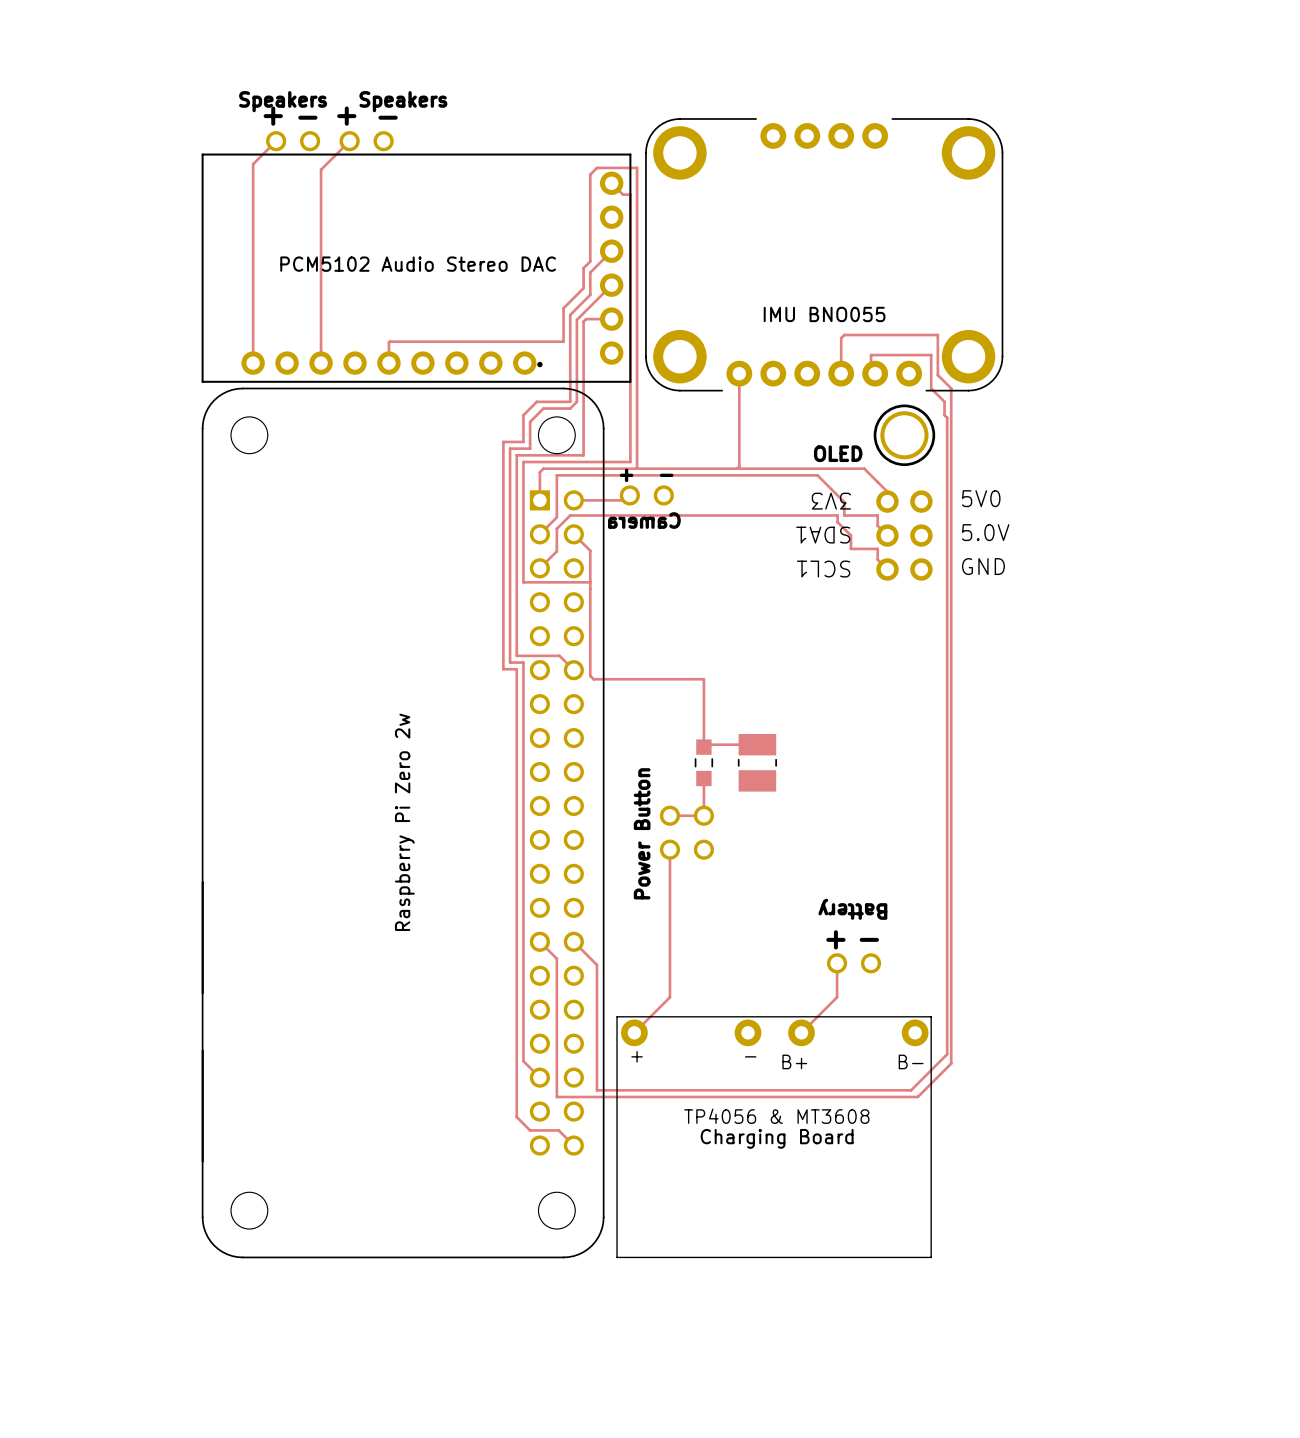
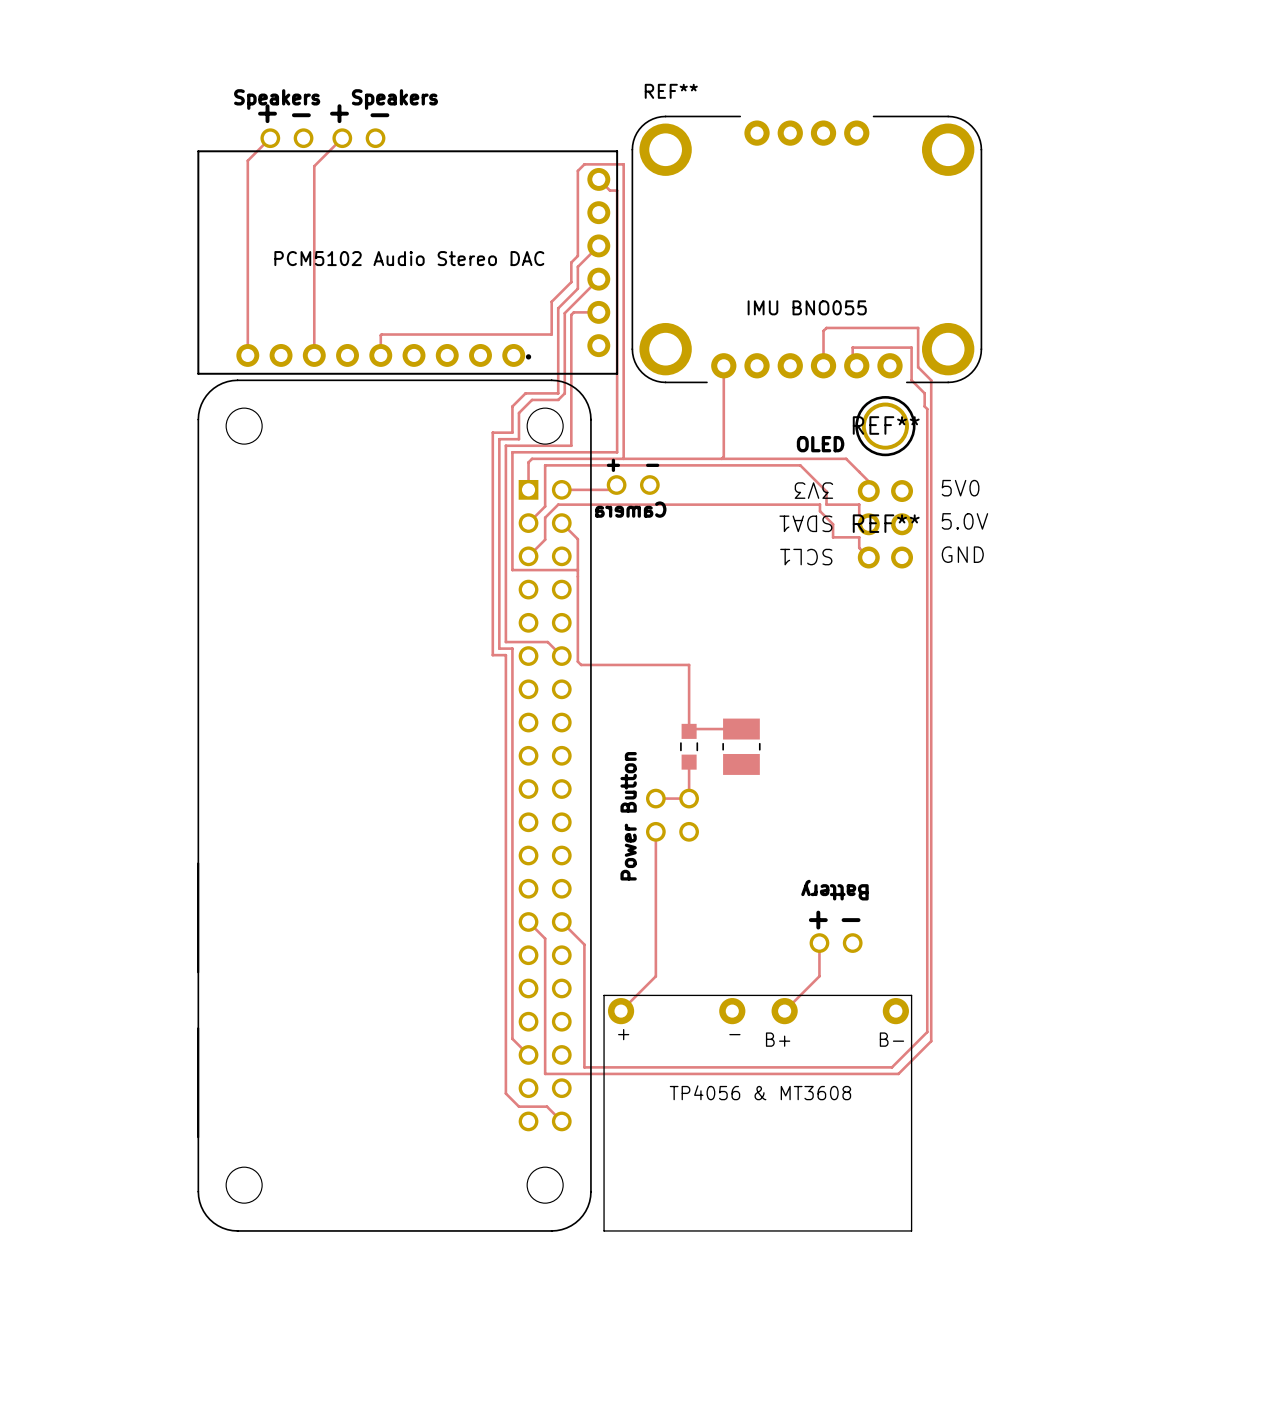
REF** name: none -> REF** (671, 91)
REF** name: none -> REF** (886, 425)
REF** name: none -> REF** (886, 523)
part value: Raspberry Pi Zero 2w (404, 822) -> none
TP4056 & MT3608 value: Charging Board (777, 1138) -> none

